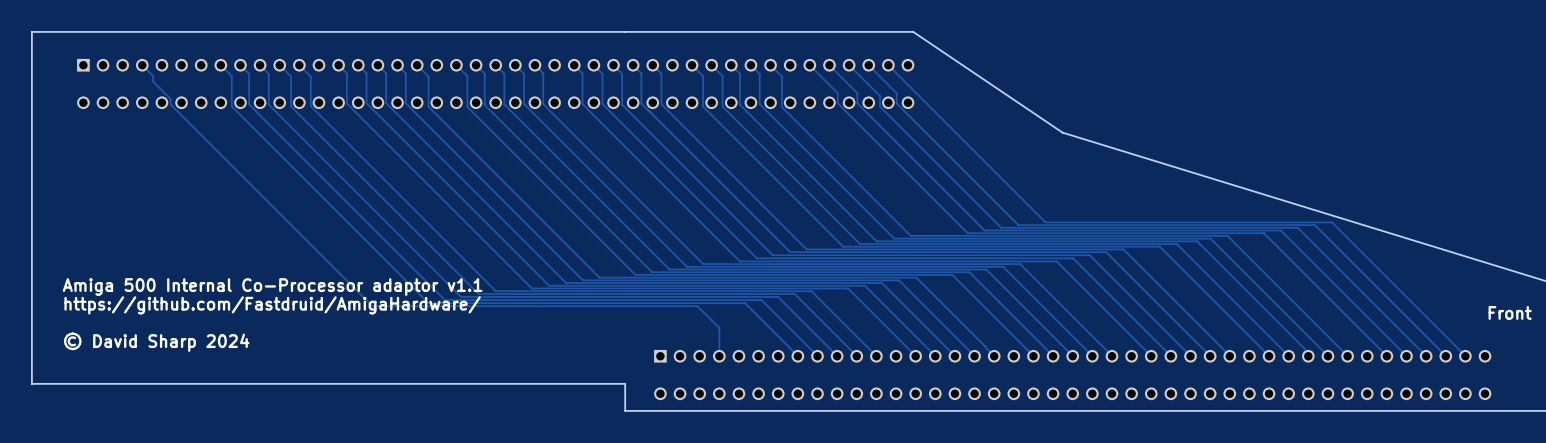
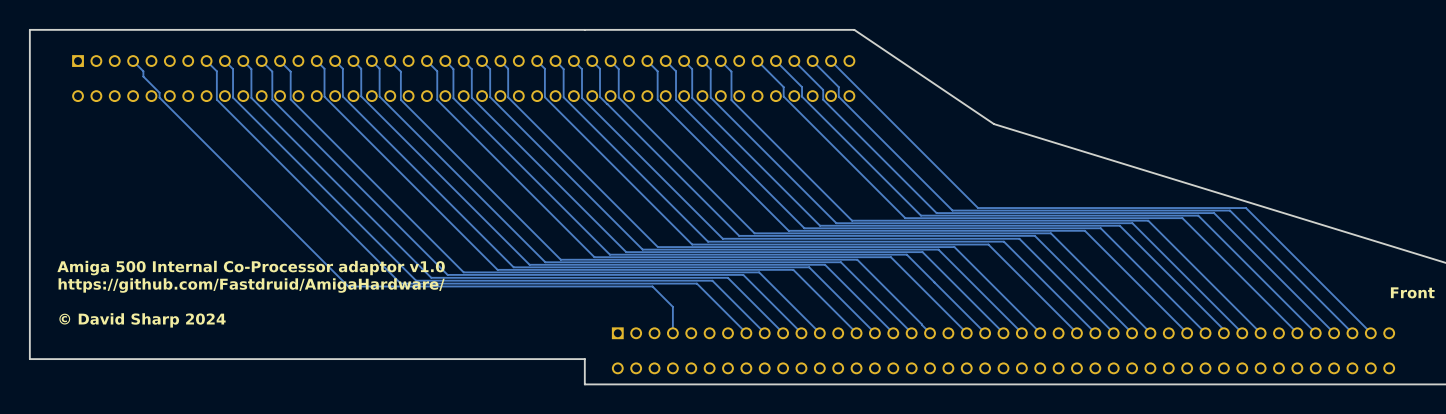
text: Amiga 500 Internal Co-Processor adaptor v1.1 (272, 287) -> Amiga 500 Internal Co-Processor adaptor v1.0 (251, 268)

